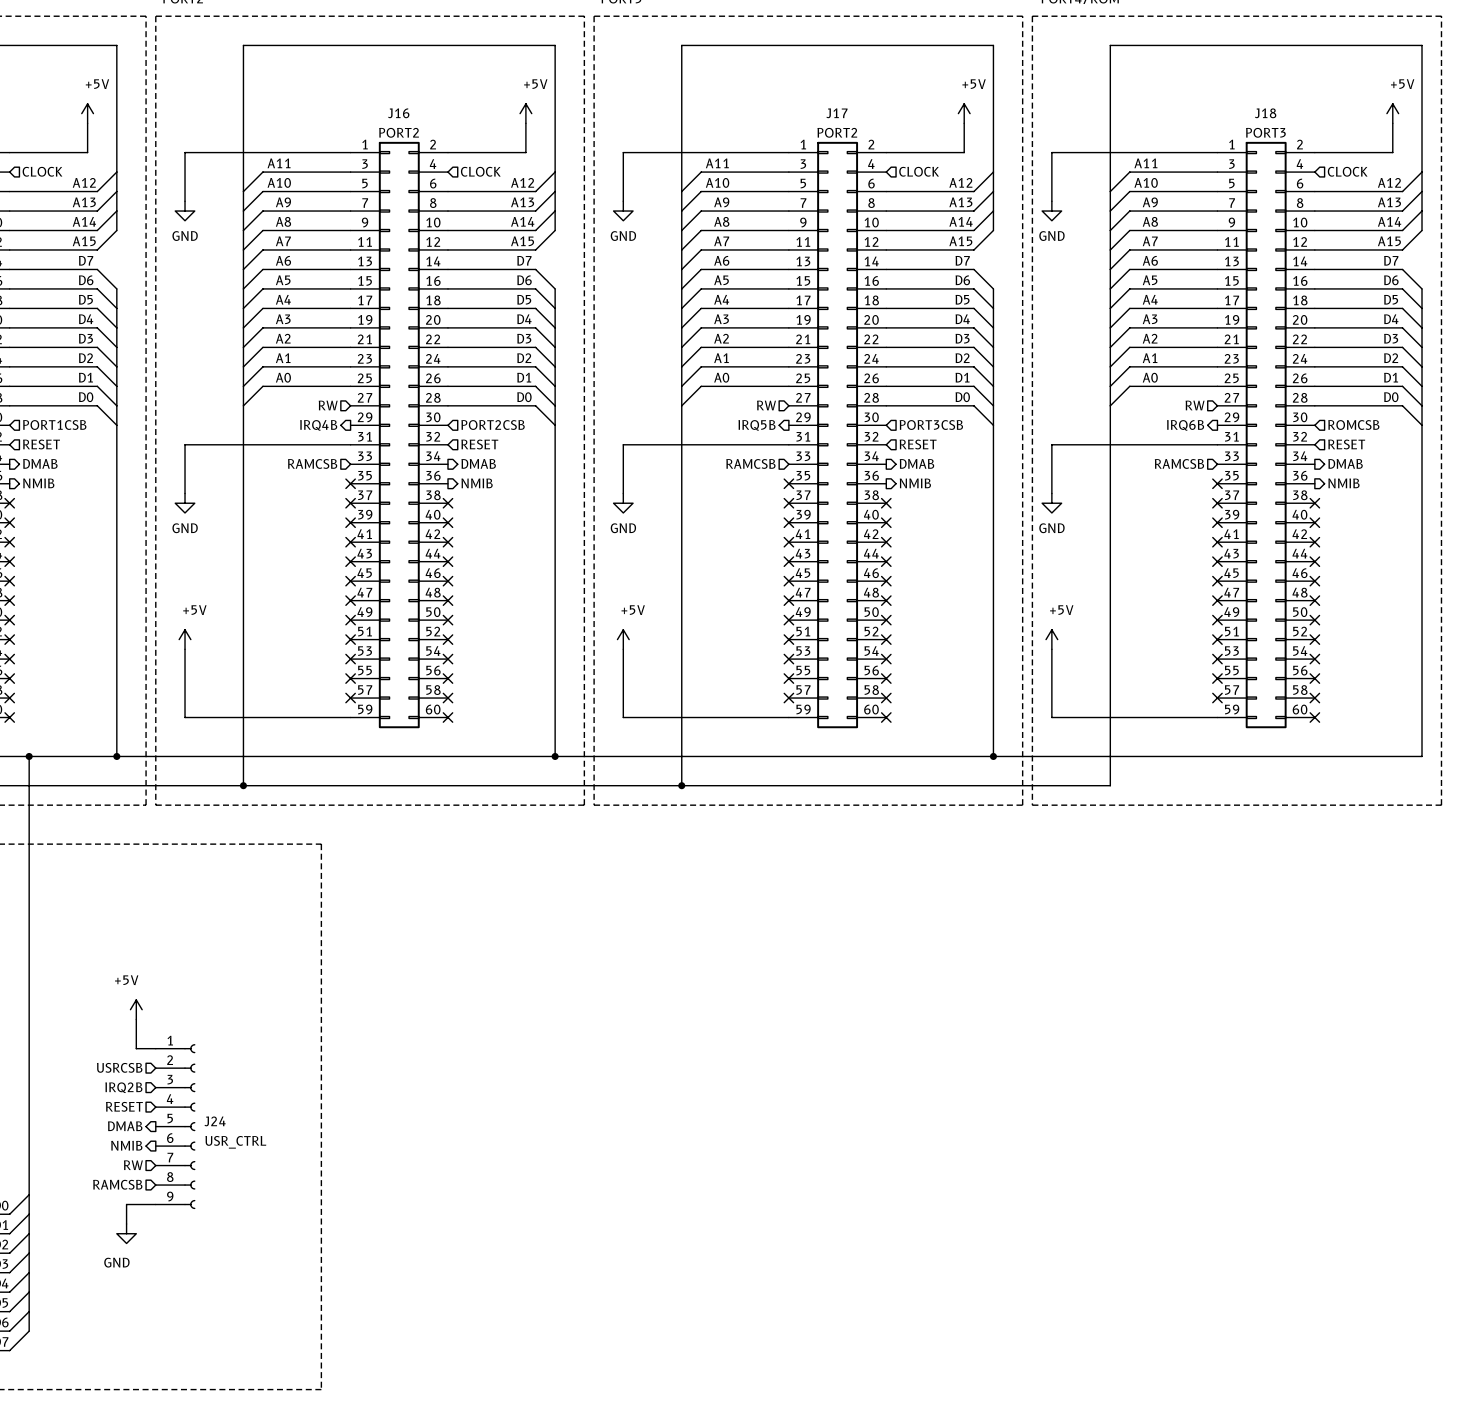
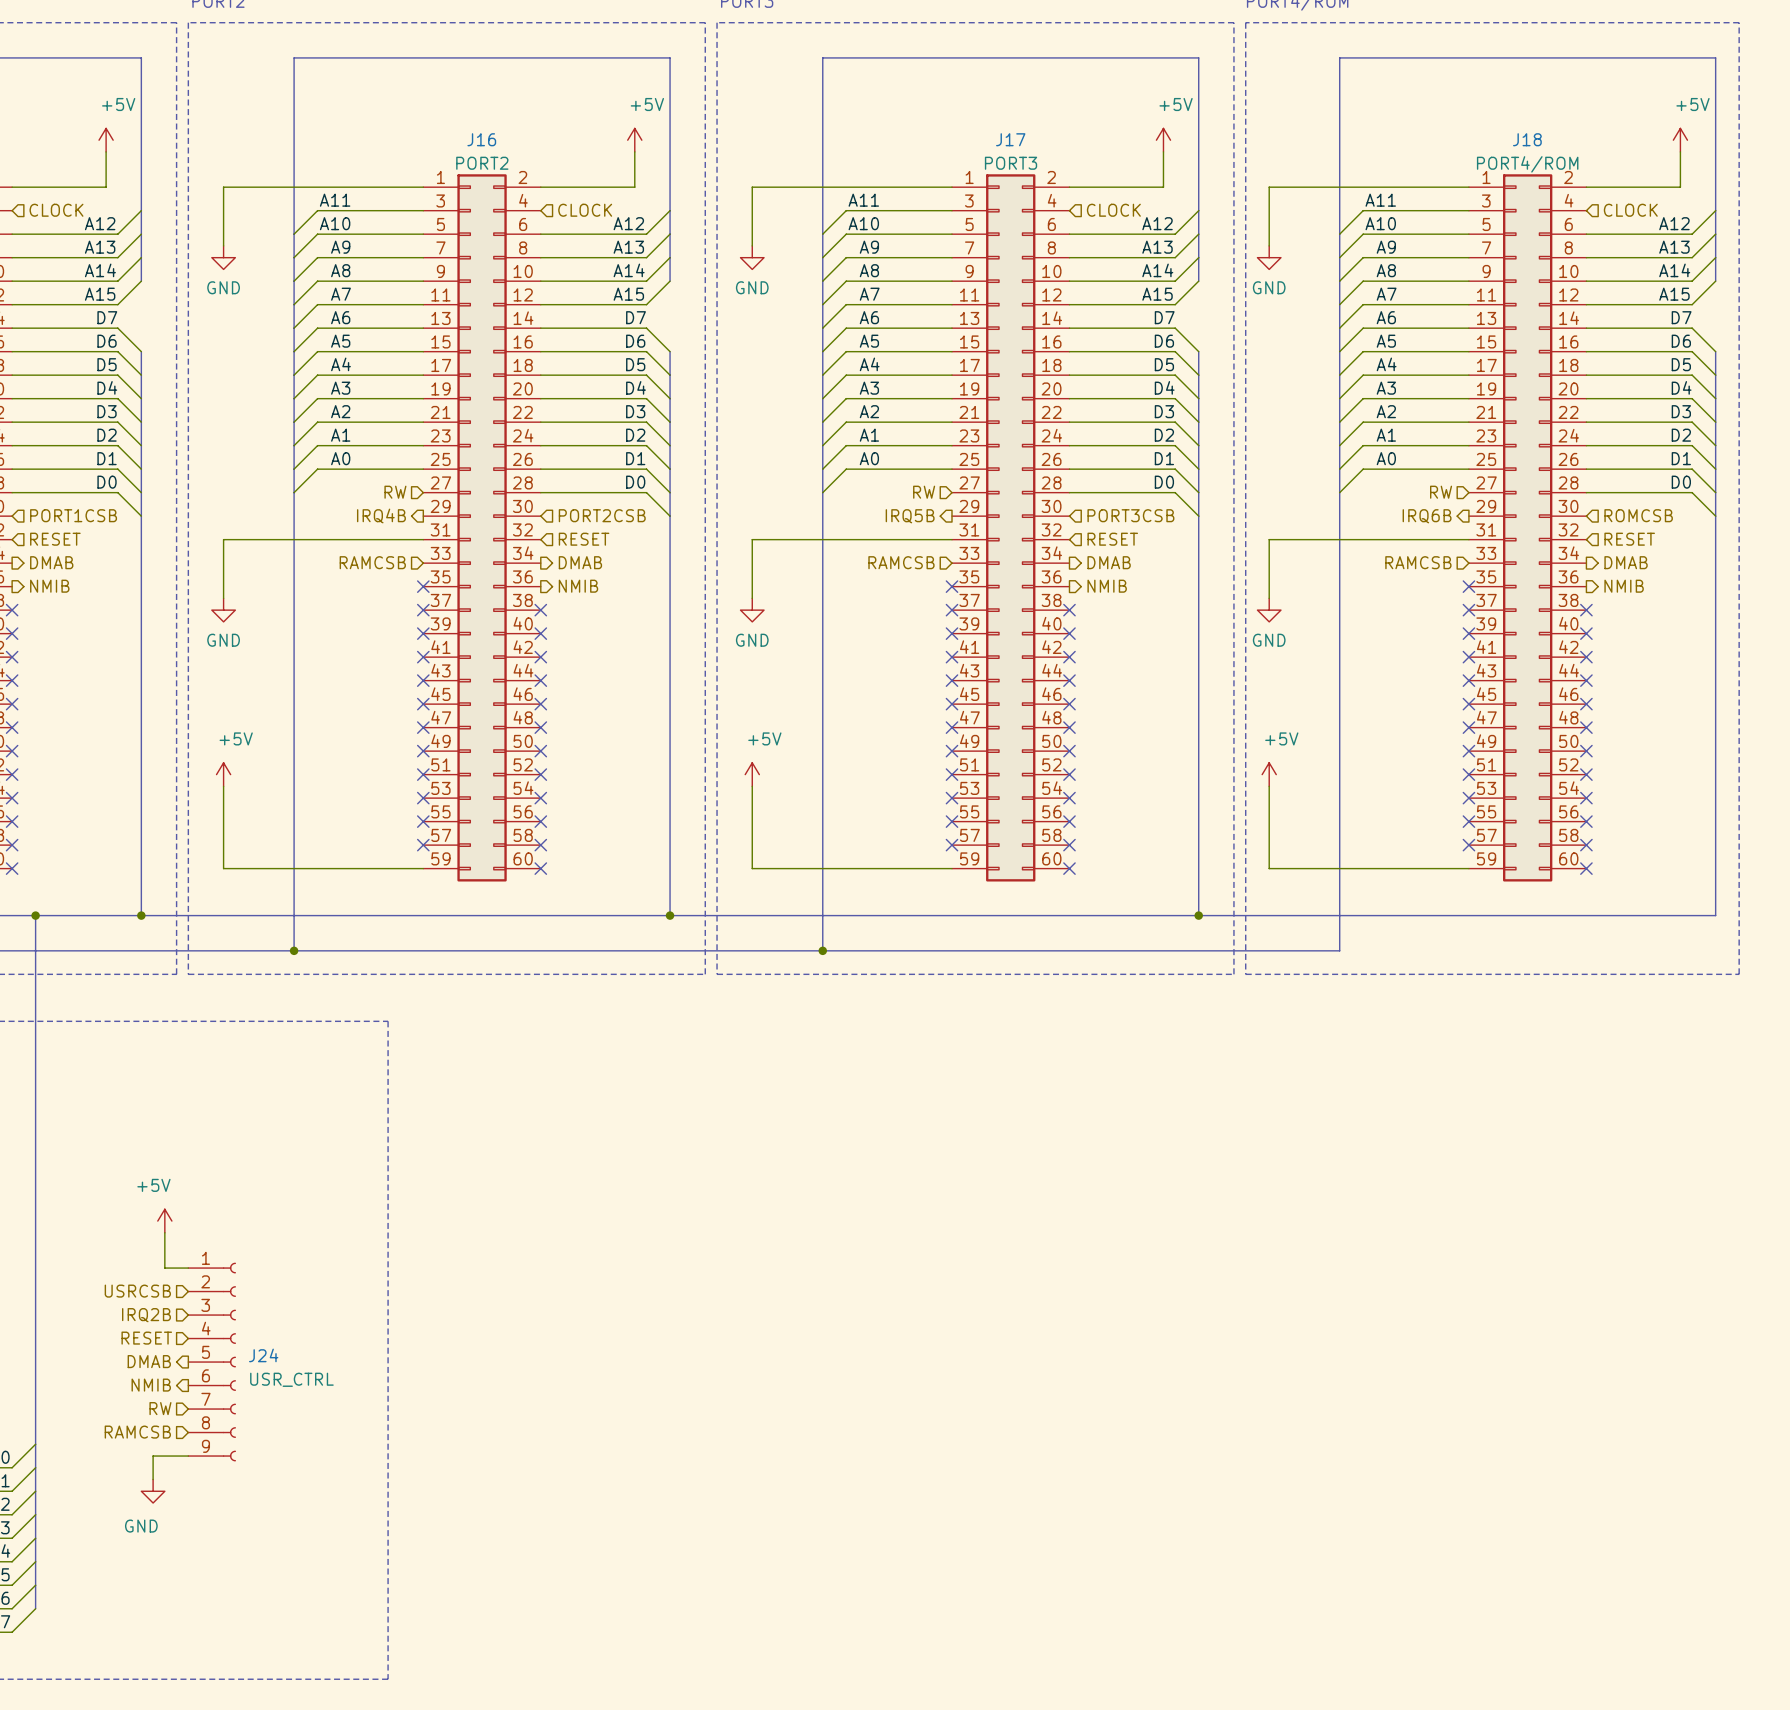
J17 value: PORT2 (837, 132) -> PORT3 (1011, 163)
J18 value: PORT3 (1265, 132) -> PORT4/ROM (1527, 164)

